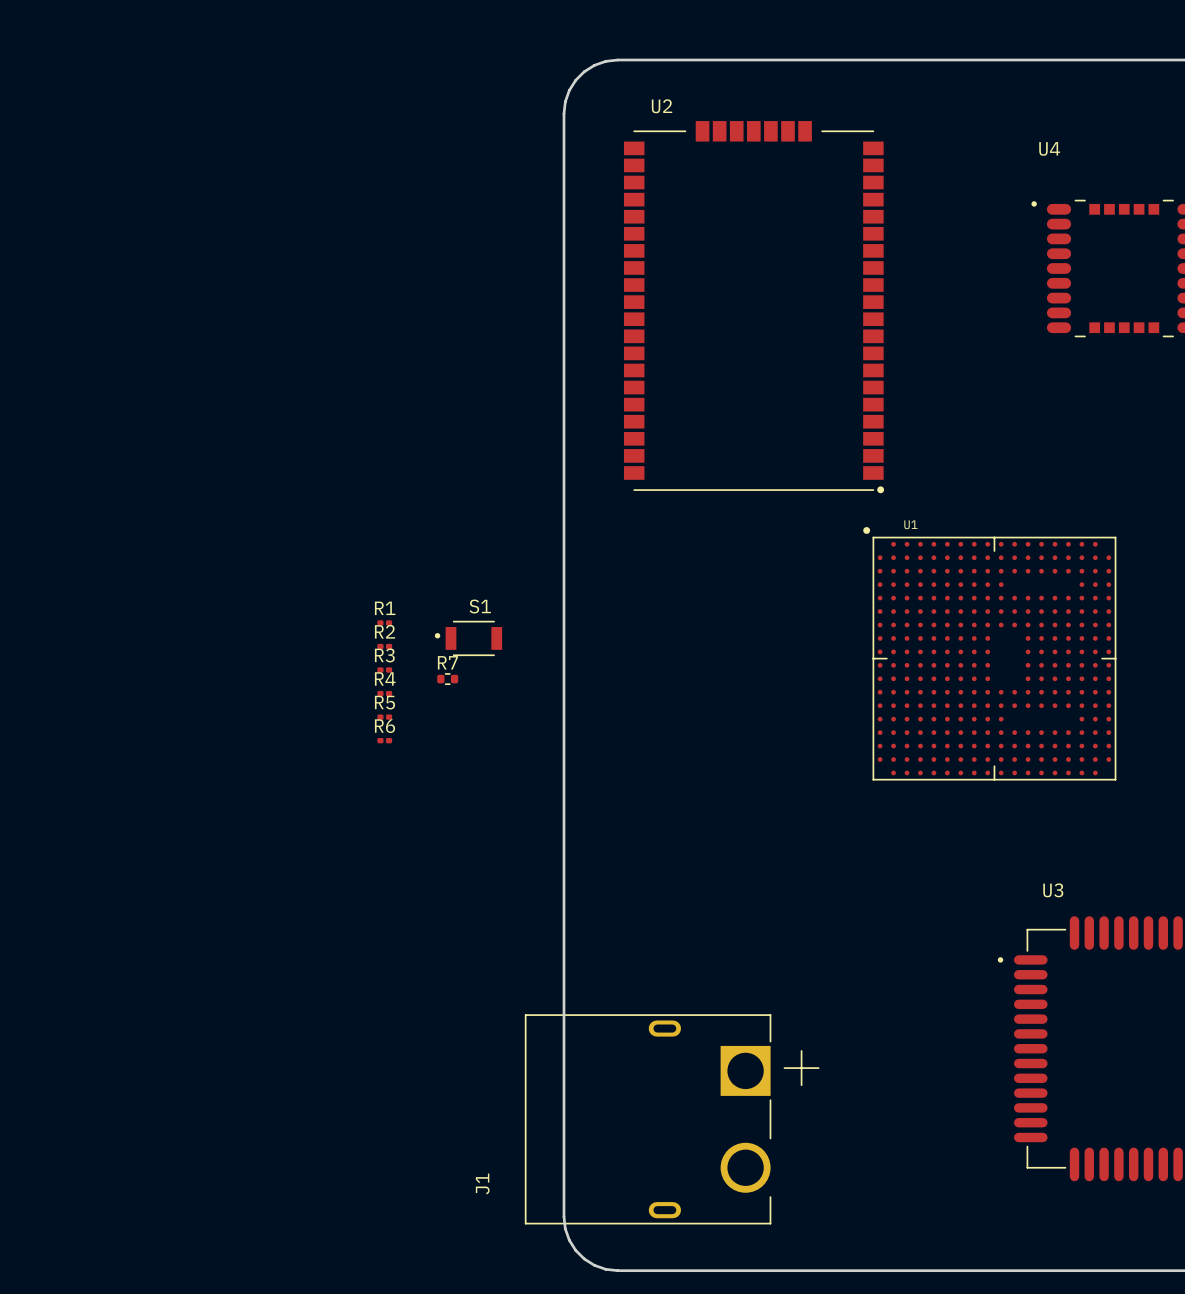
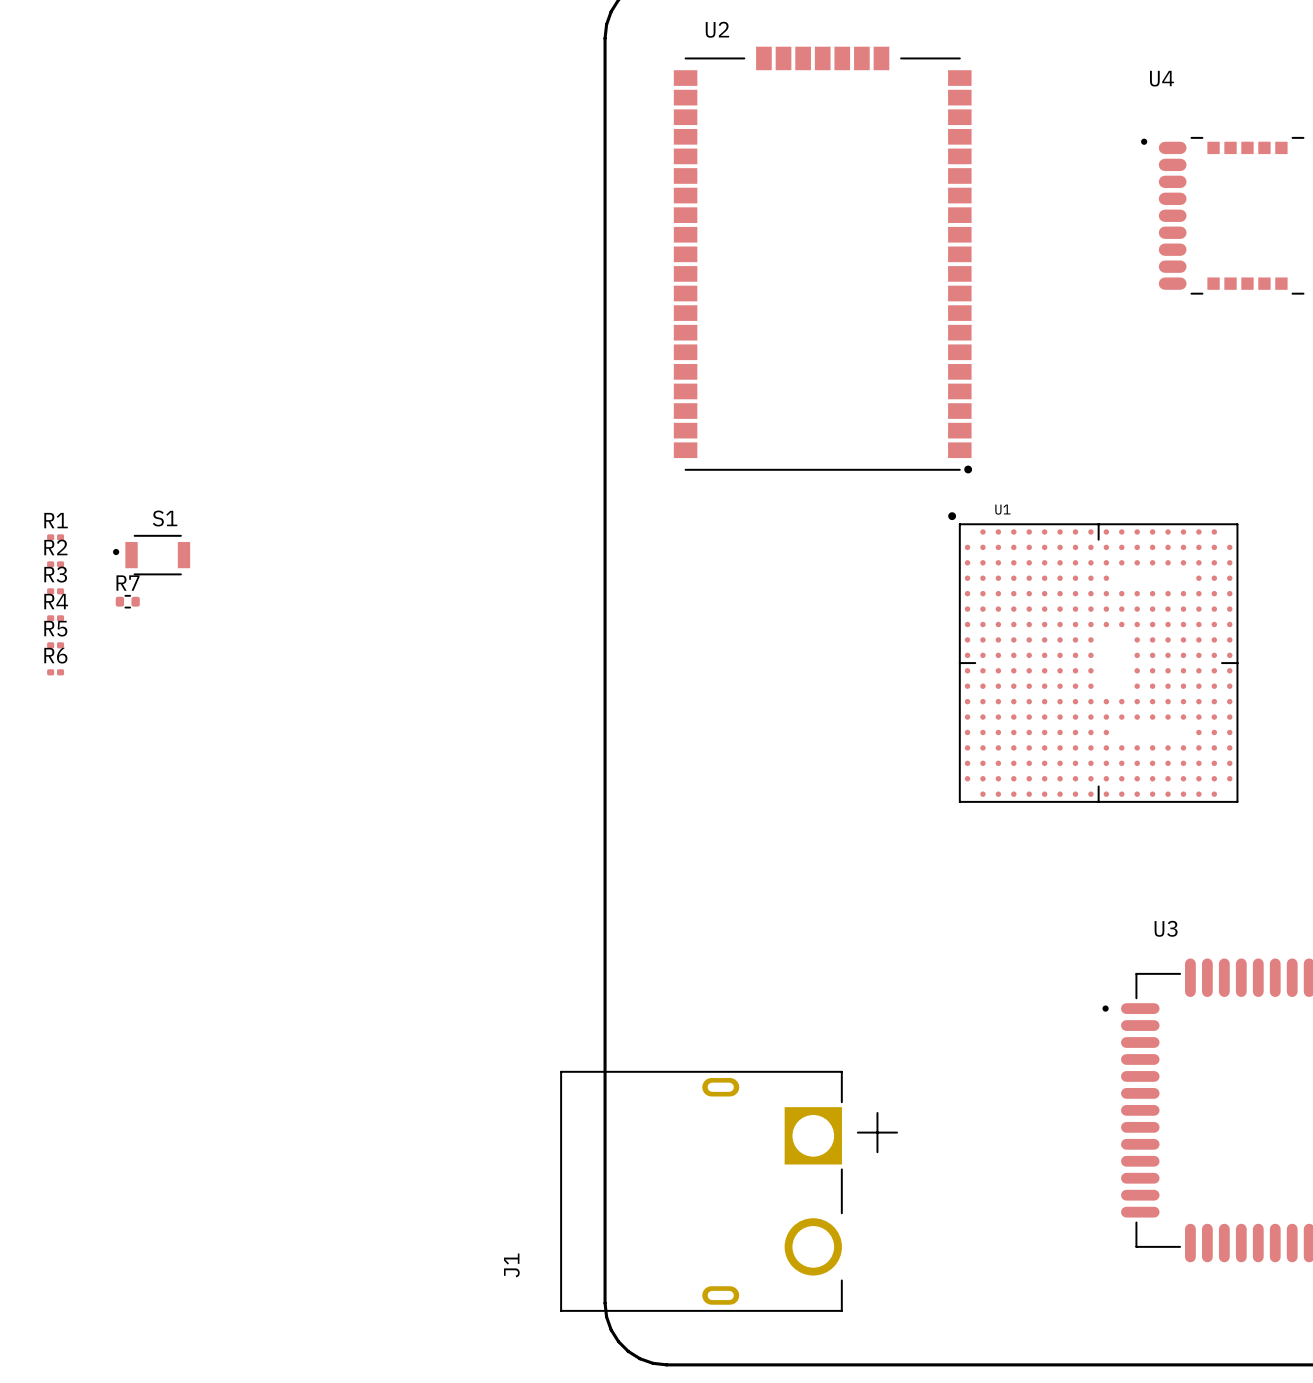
R1 position: (384, 622) -> (55, 537)
S1 position: (468, 638) -> (151, 555)
R2 position: (384, 646) -> (55, 564)
R3 position: (384, 670) -> (55, 591)
R7 position: (447, 679) -> (127, 601)
R4 position: (384, 693) -> (55, 618)
R5 position: (384, 717) -> (55, 645)
R6 position: (384, 740) -> (55, 672)

